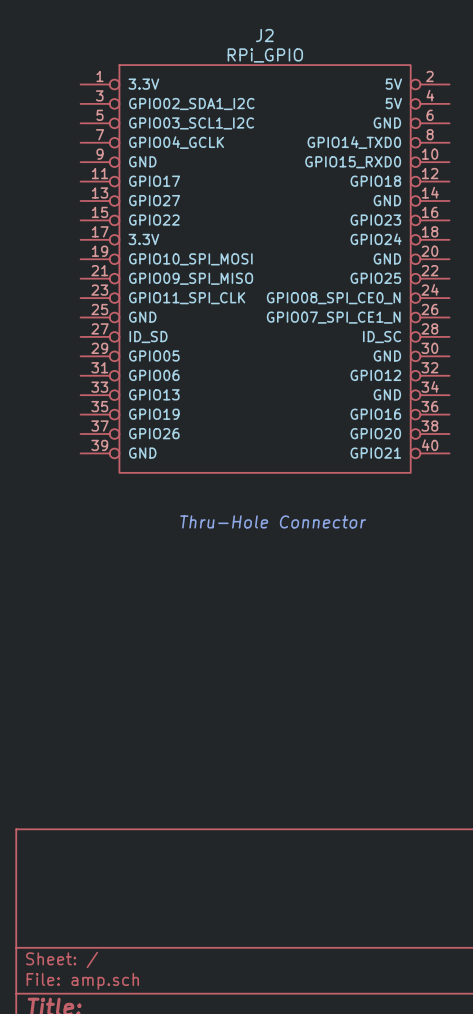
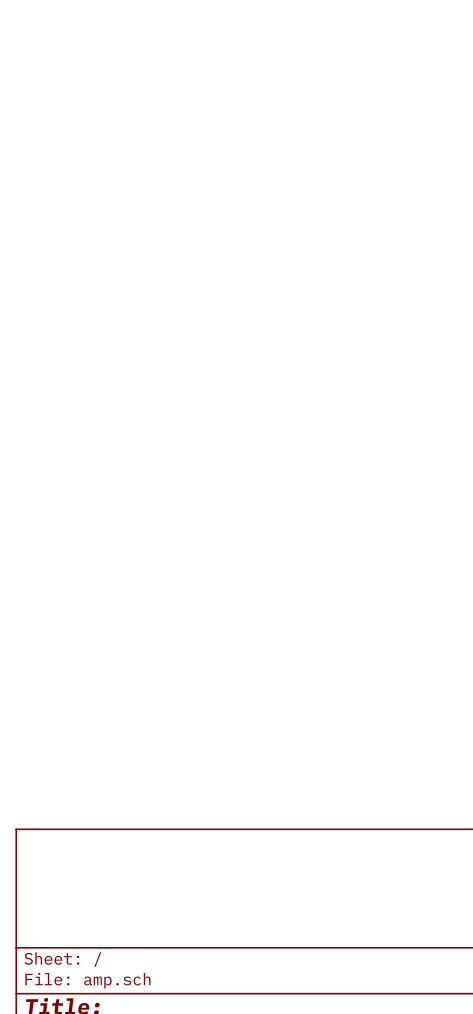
J2: RPi_GPIO (265, 268) -> none
text: Thru-Hole Connector (273, 521) -> none

